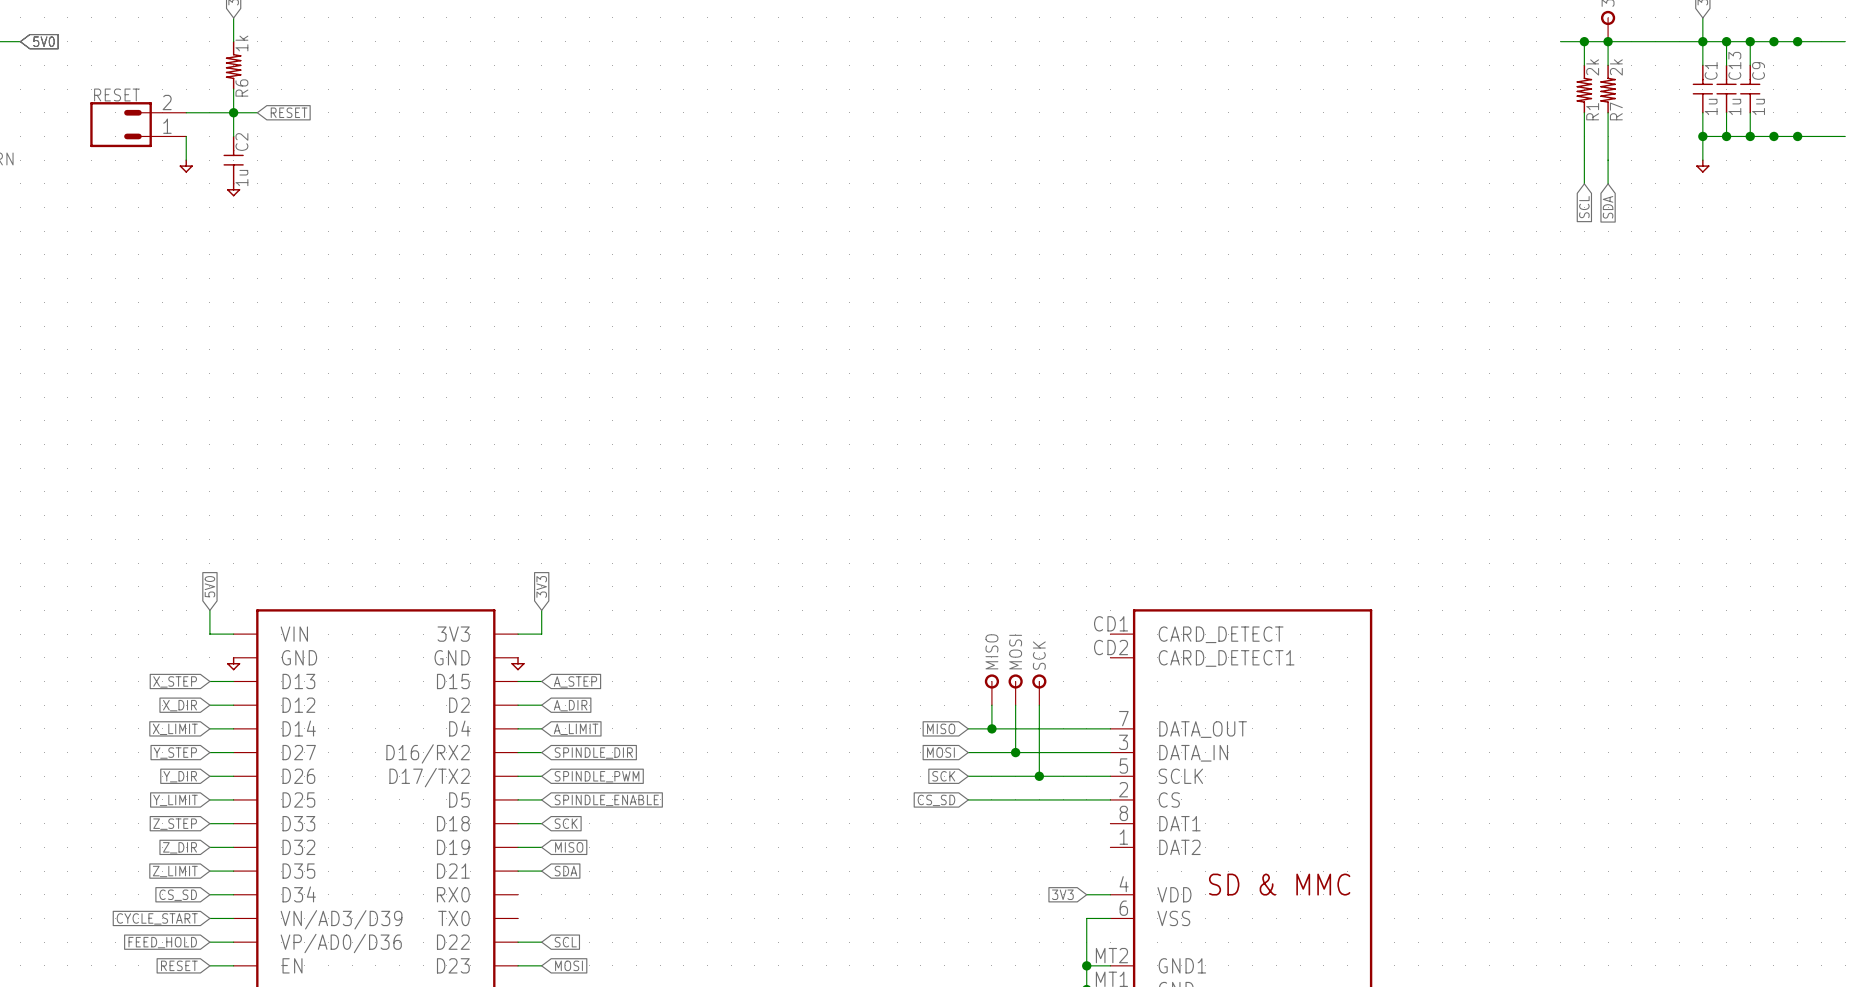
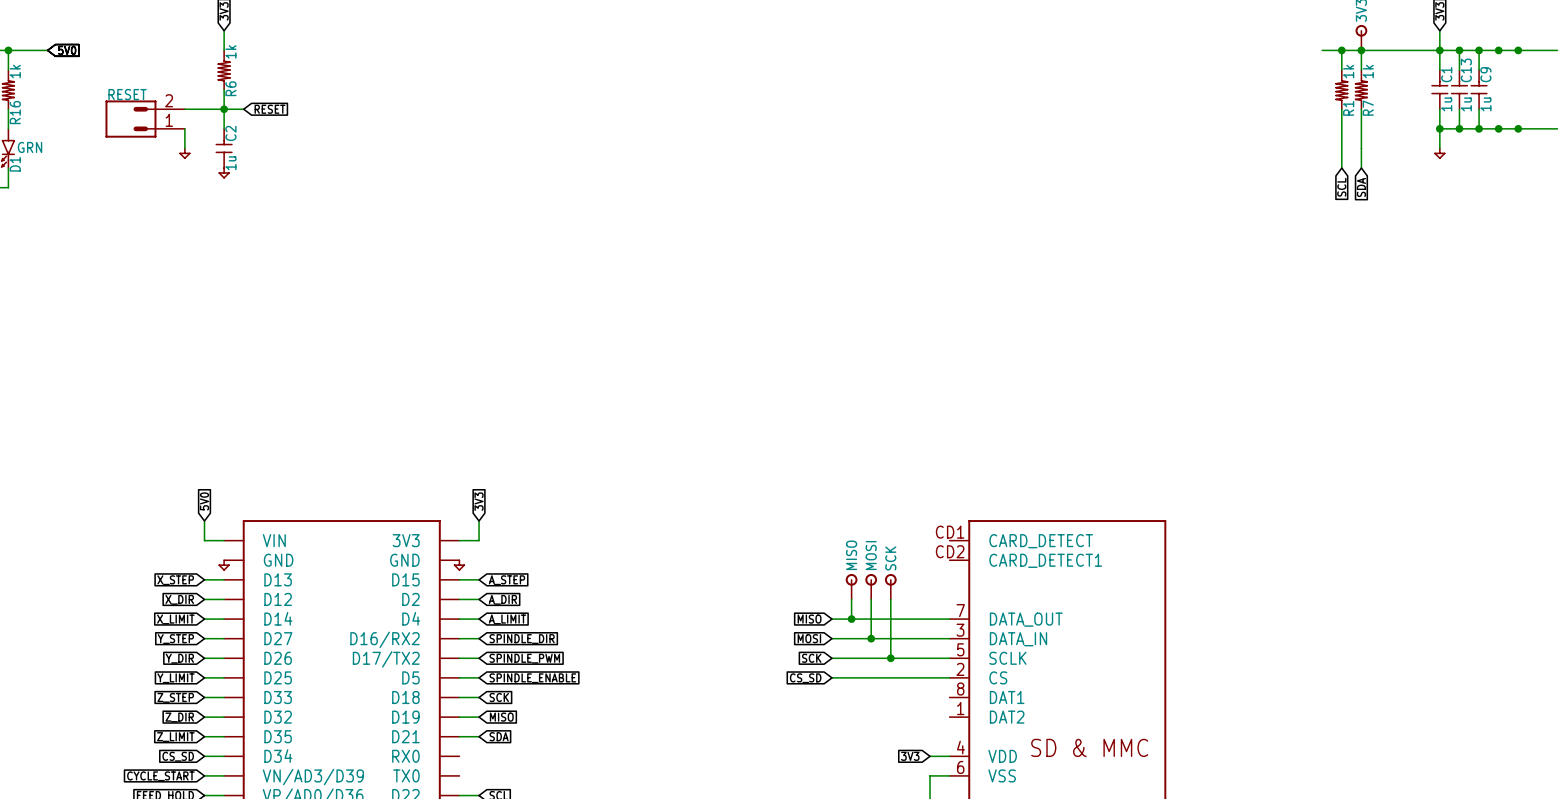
R1 value: 2k (1592, 67) -> 1k (1348, 71)
R7 value: 2k (1616, 67) -> 1k (1368, 71)

